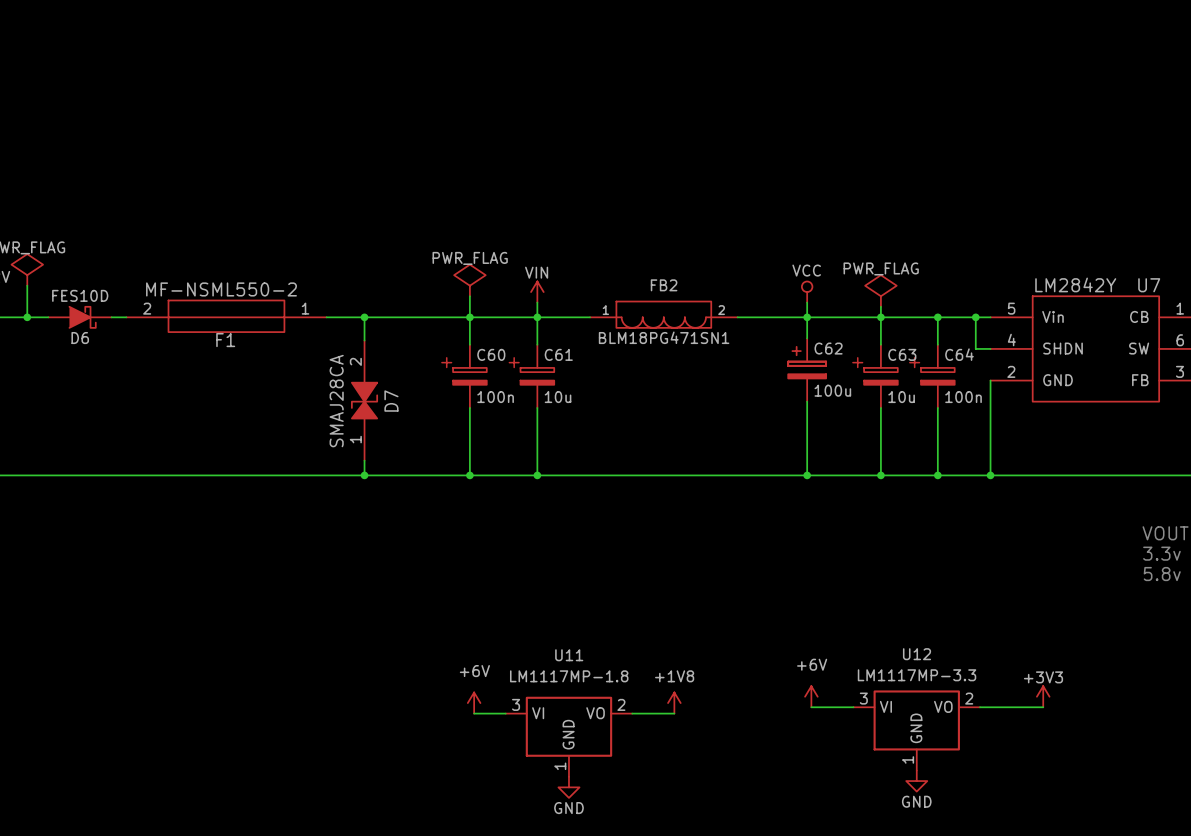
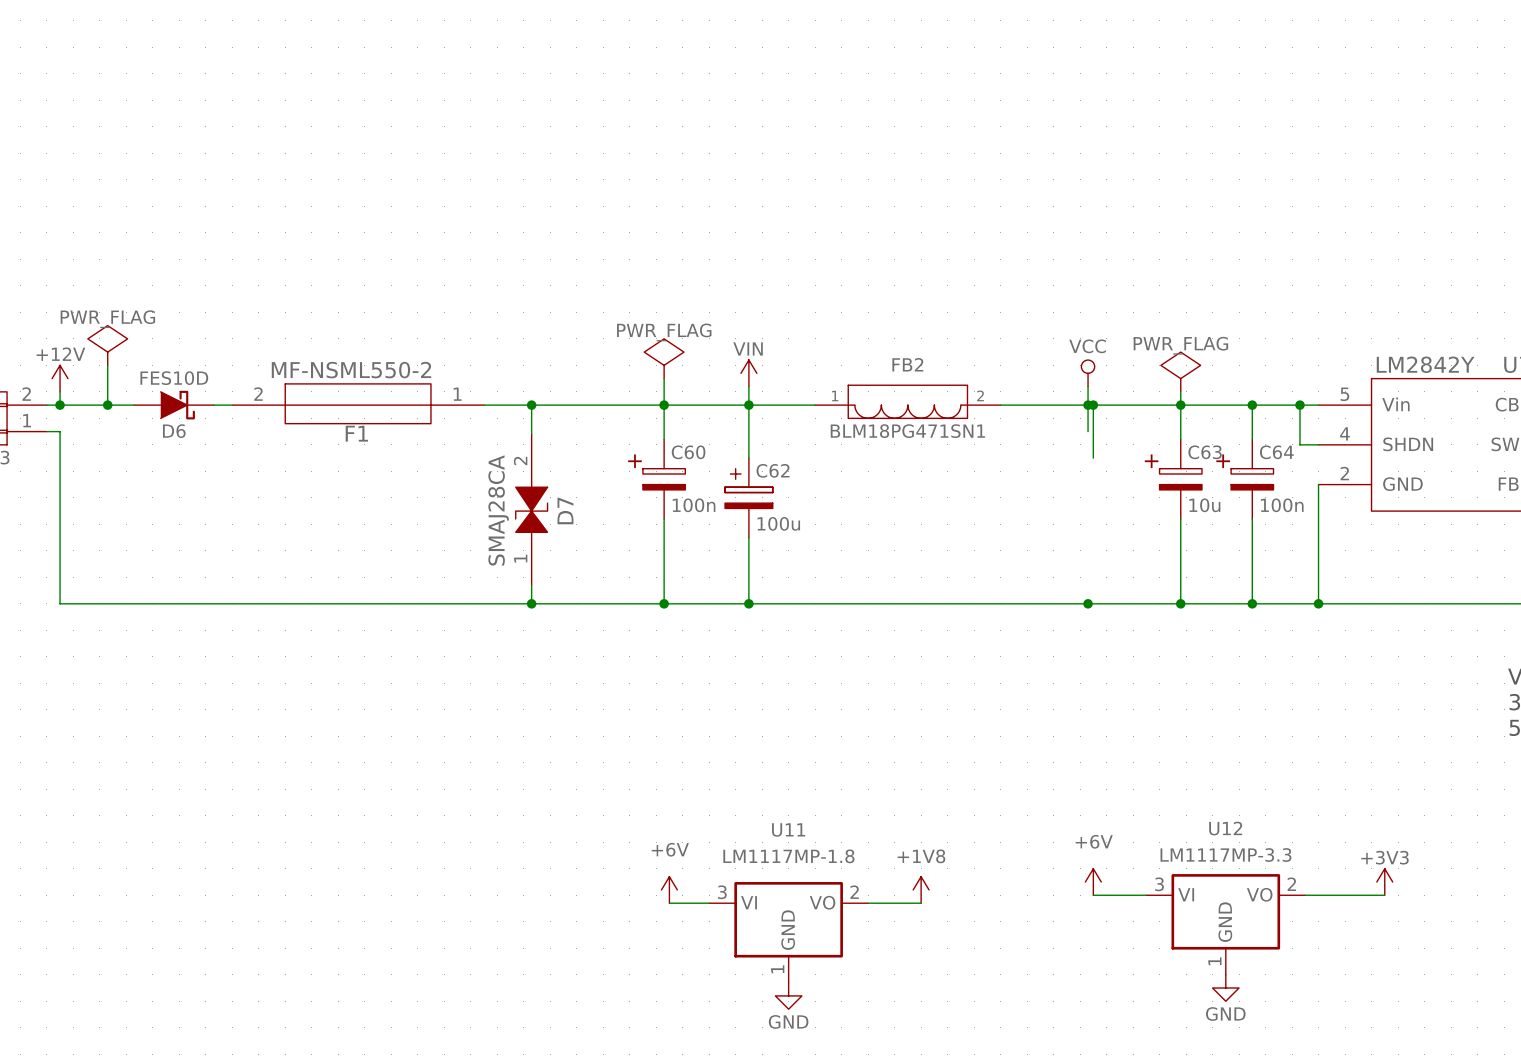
wire: none -> (1093, 405) (1093, 458)
junction: none -> (1093, 405)
C62 position: (807, 370) -> (748, 497)
C61: 10u (537, 376) -> none
wire: (807, 401) (807, 475) -> none

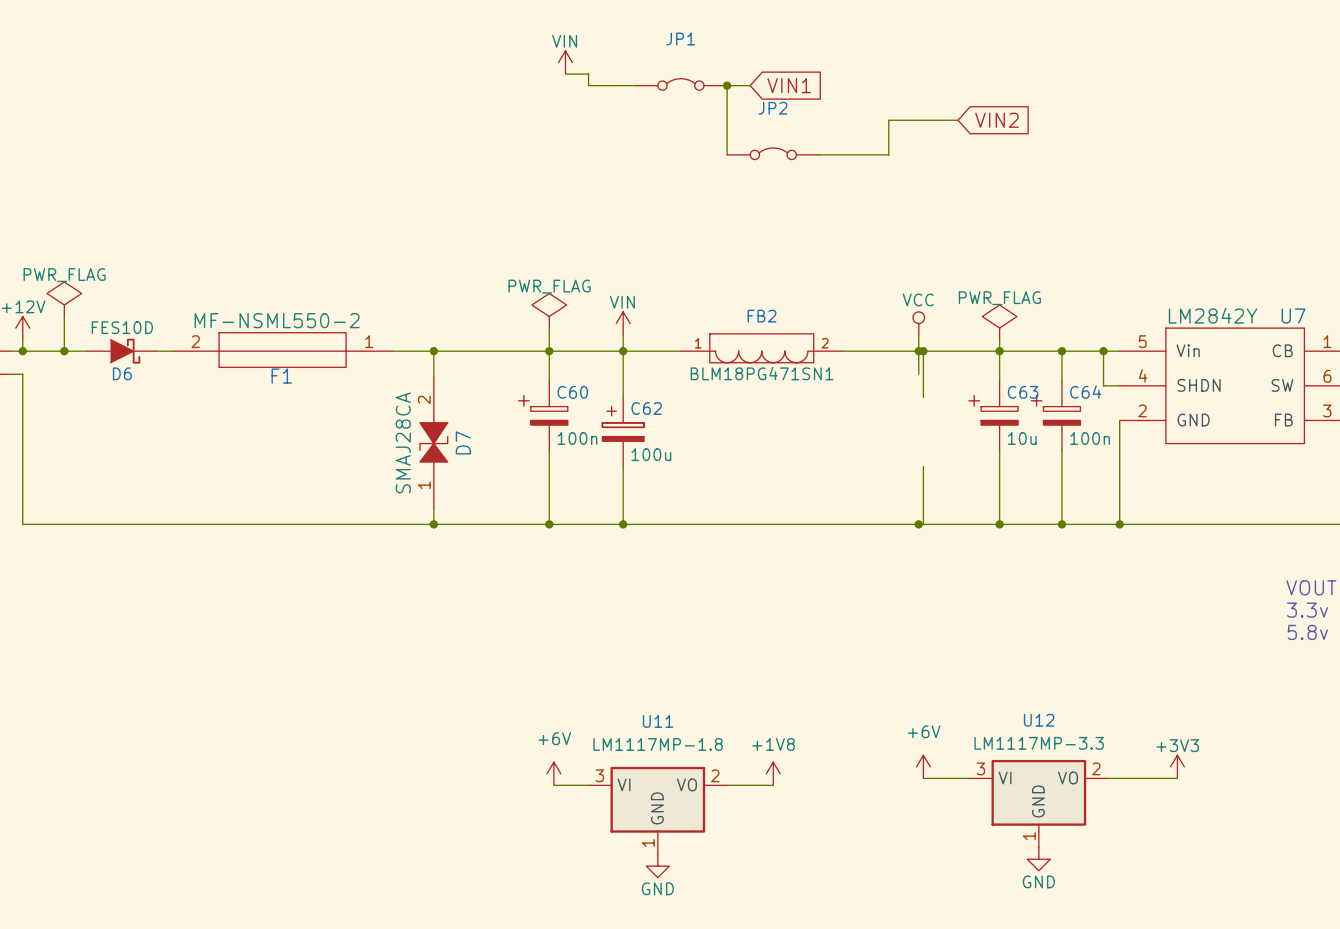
power symbol: none -> VIN (565, 62)
wire: none -> (565, 74) (588, 74) (588, 85) (634, 85)
JP1: none -> (680, 84)
junction: none -> (727, 85)
wire: none -> (750, 85) (727, 85) (727, 154)
global label: none -> VIN1 (789, 85)
wire: none -> (958, 120) (888, 120) (888, 154) (819, 154)
global label: none -> VIN2 (996, 120)
JP2: none -> (773, 153)
wire: none -> (923, 466) (923, 524)

